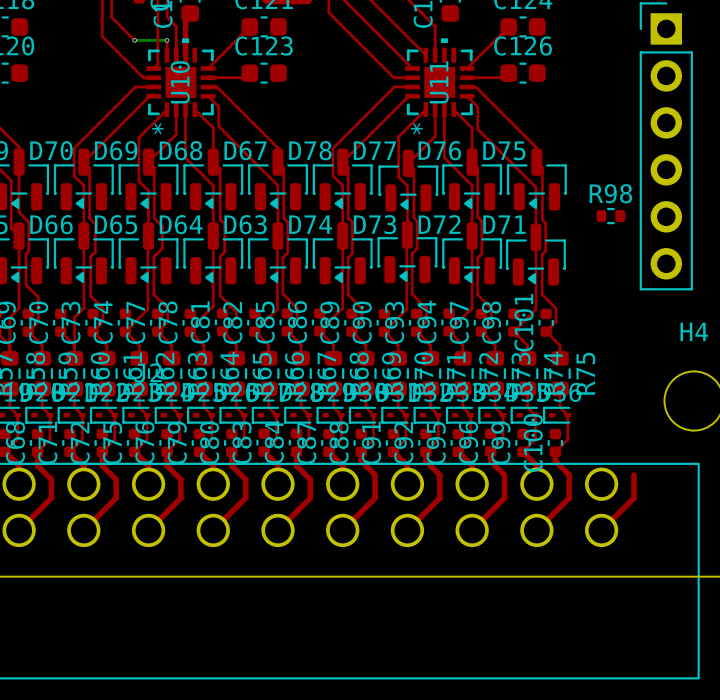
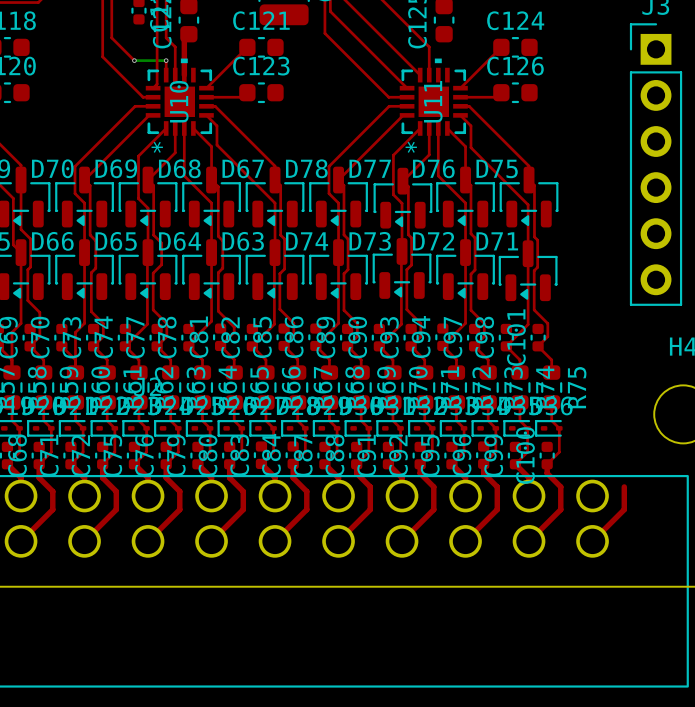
R98: (610, 216) -> none

